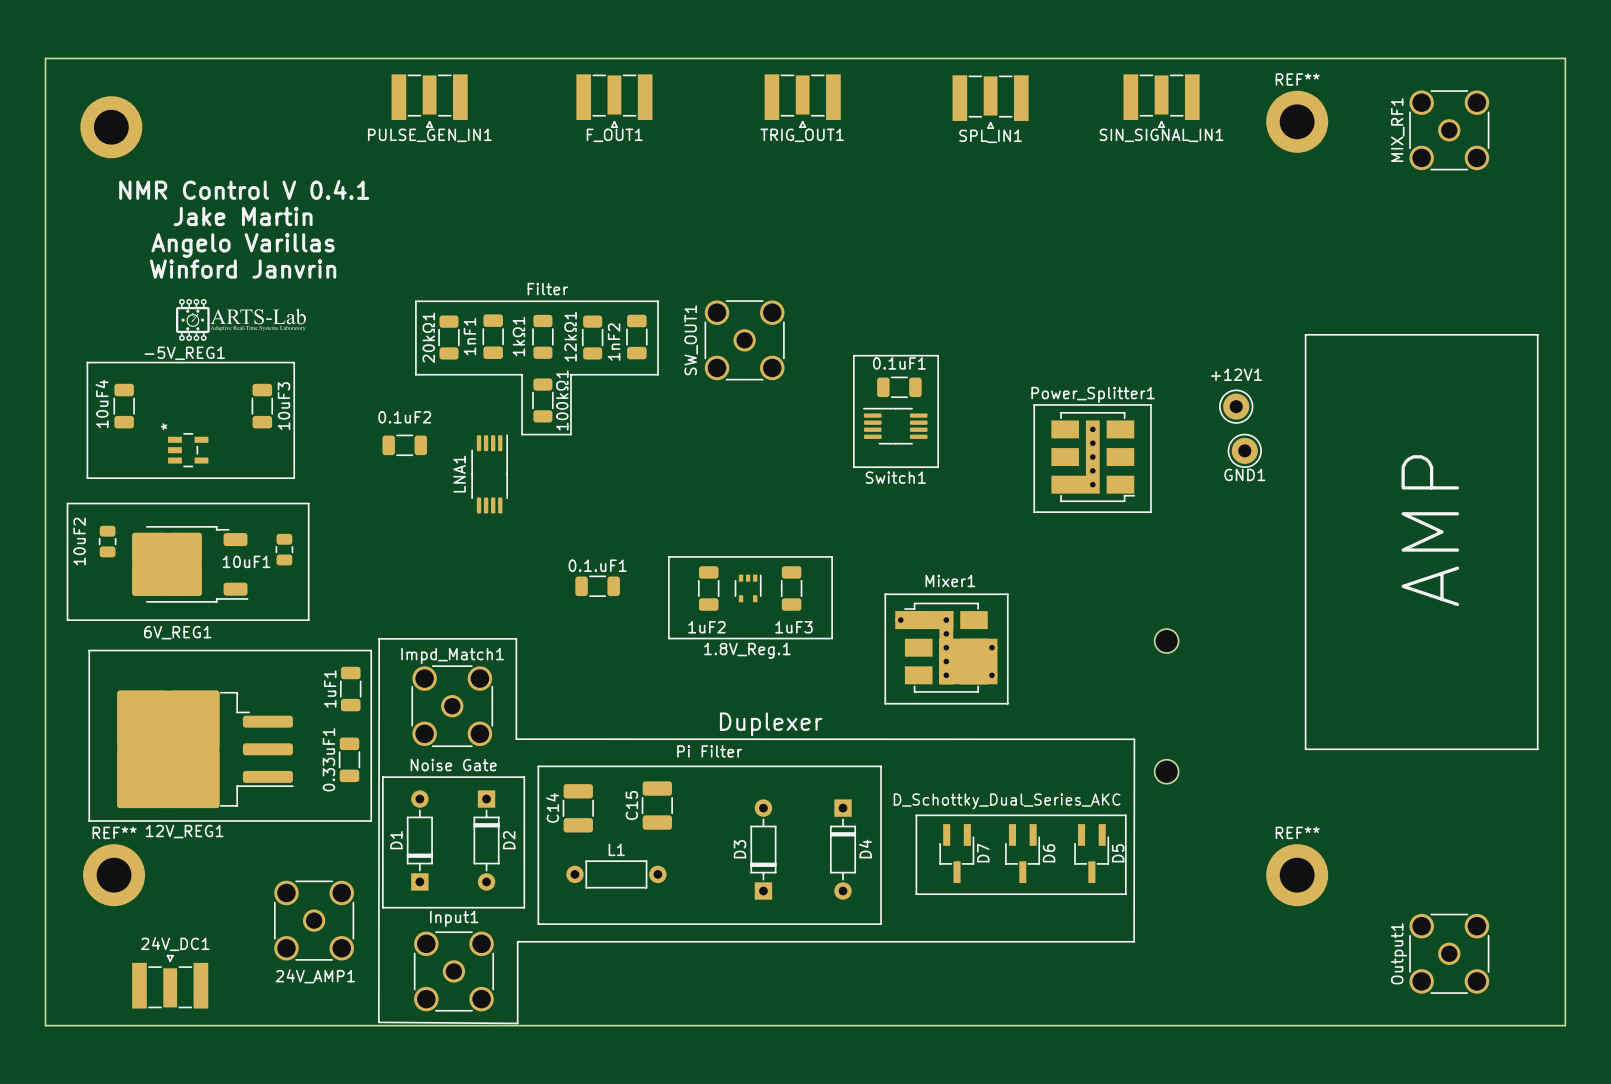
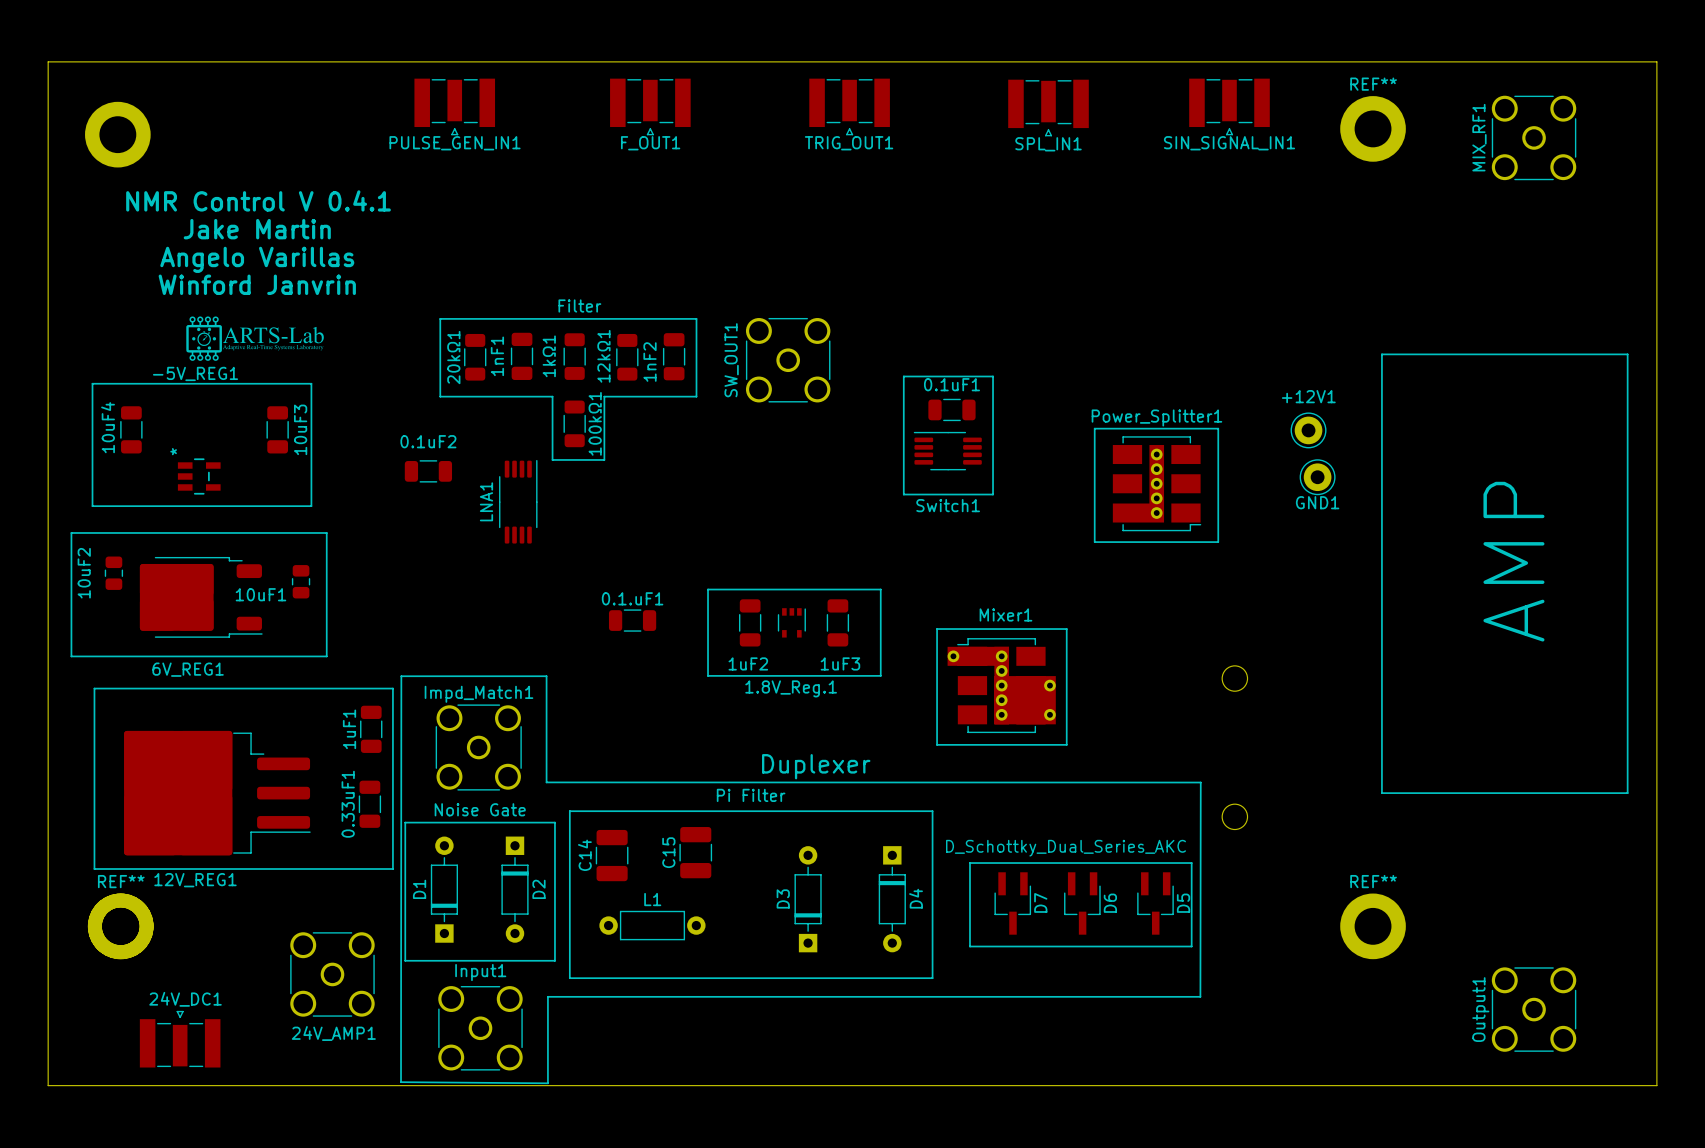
part: none -> (120, 926)

